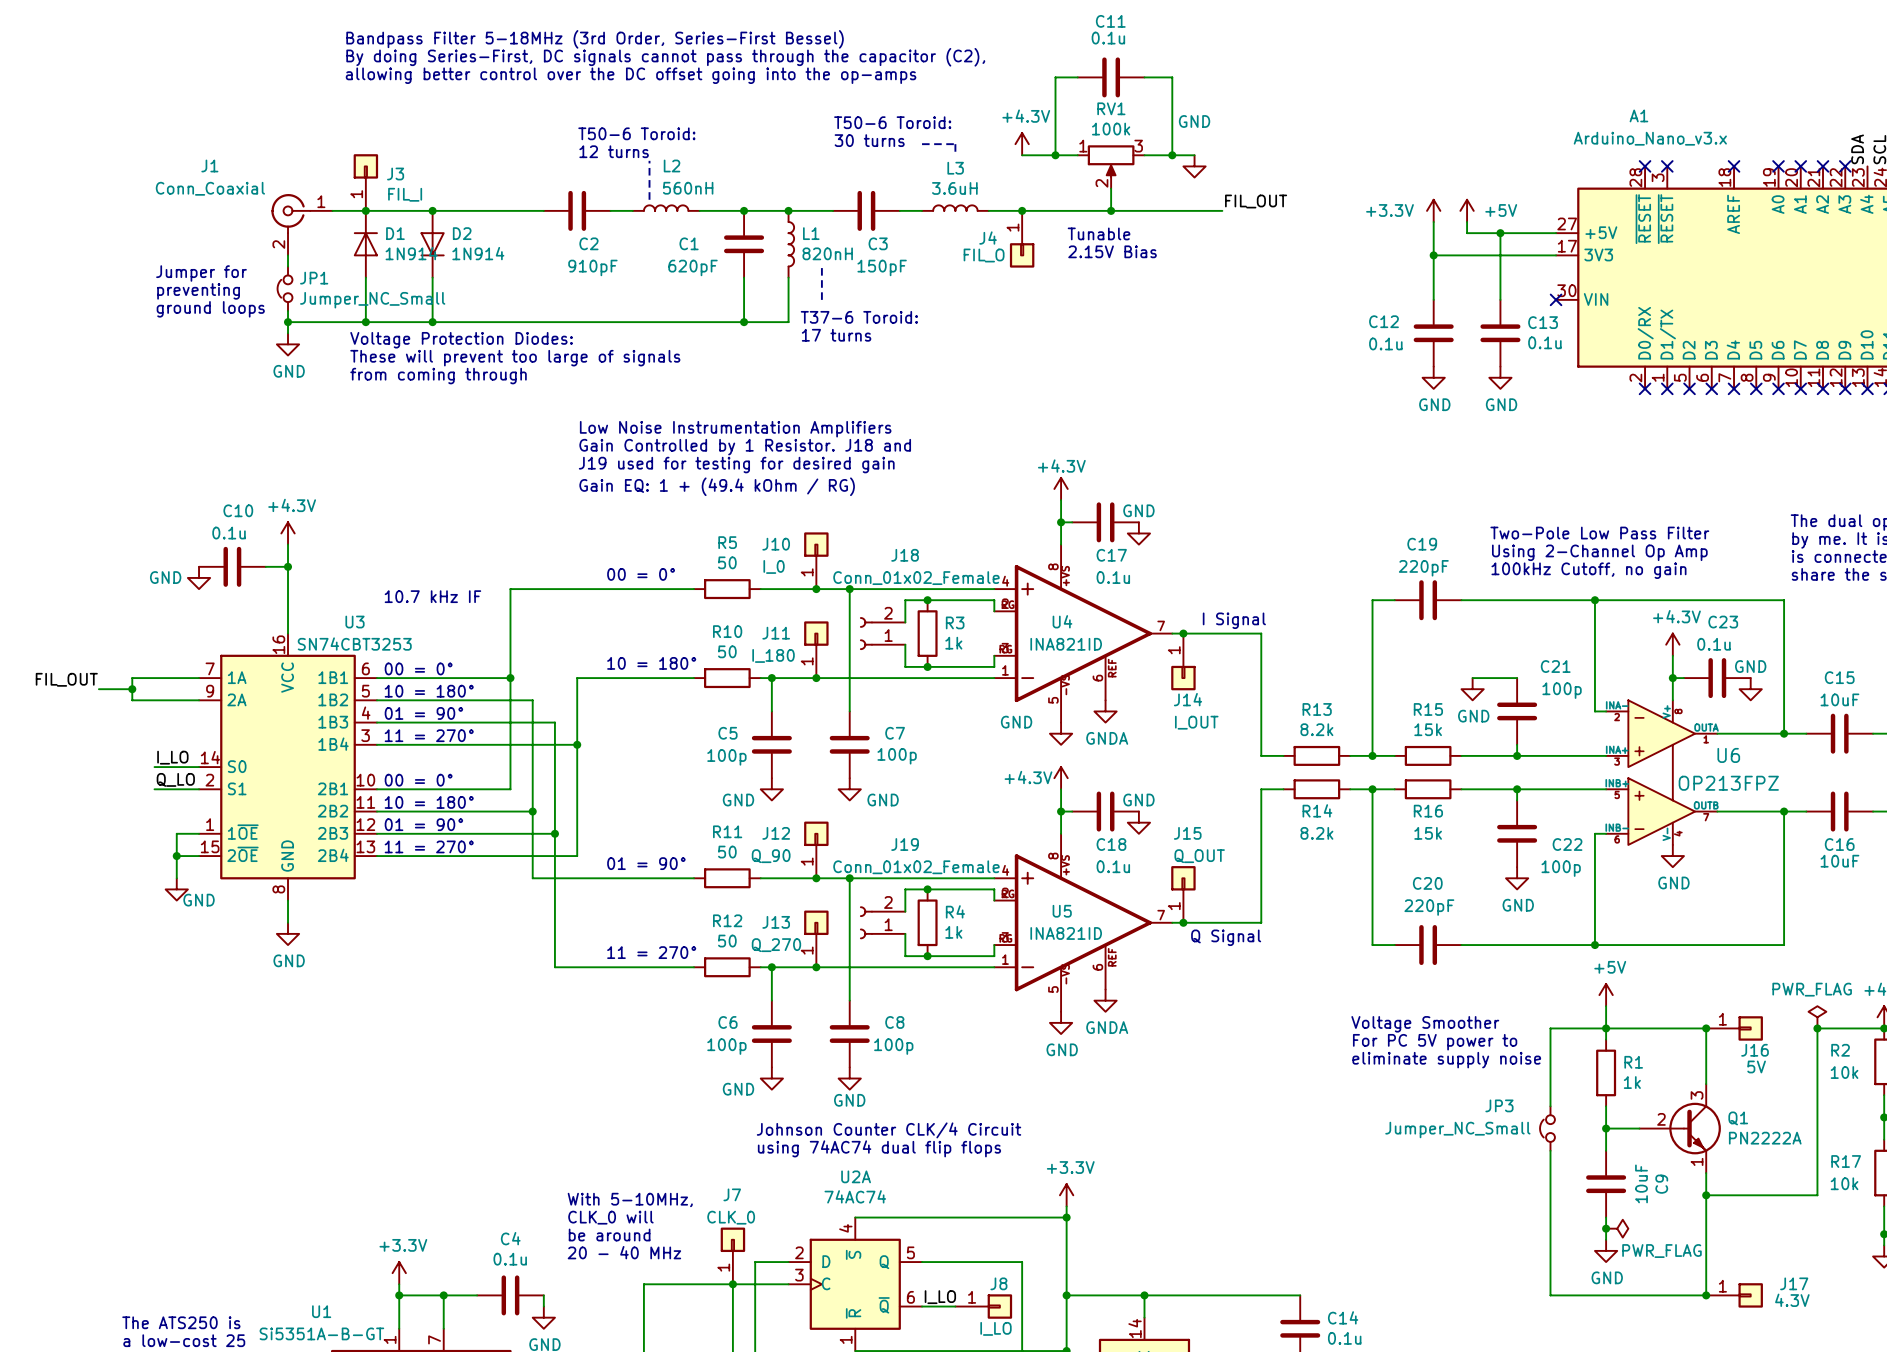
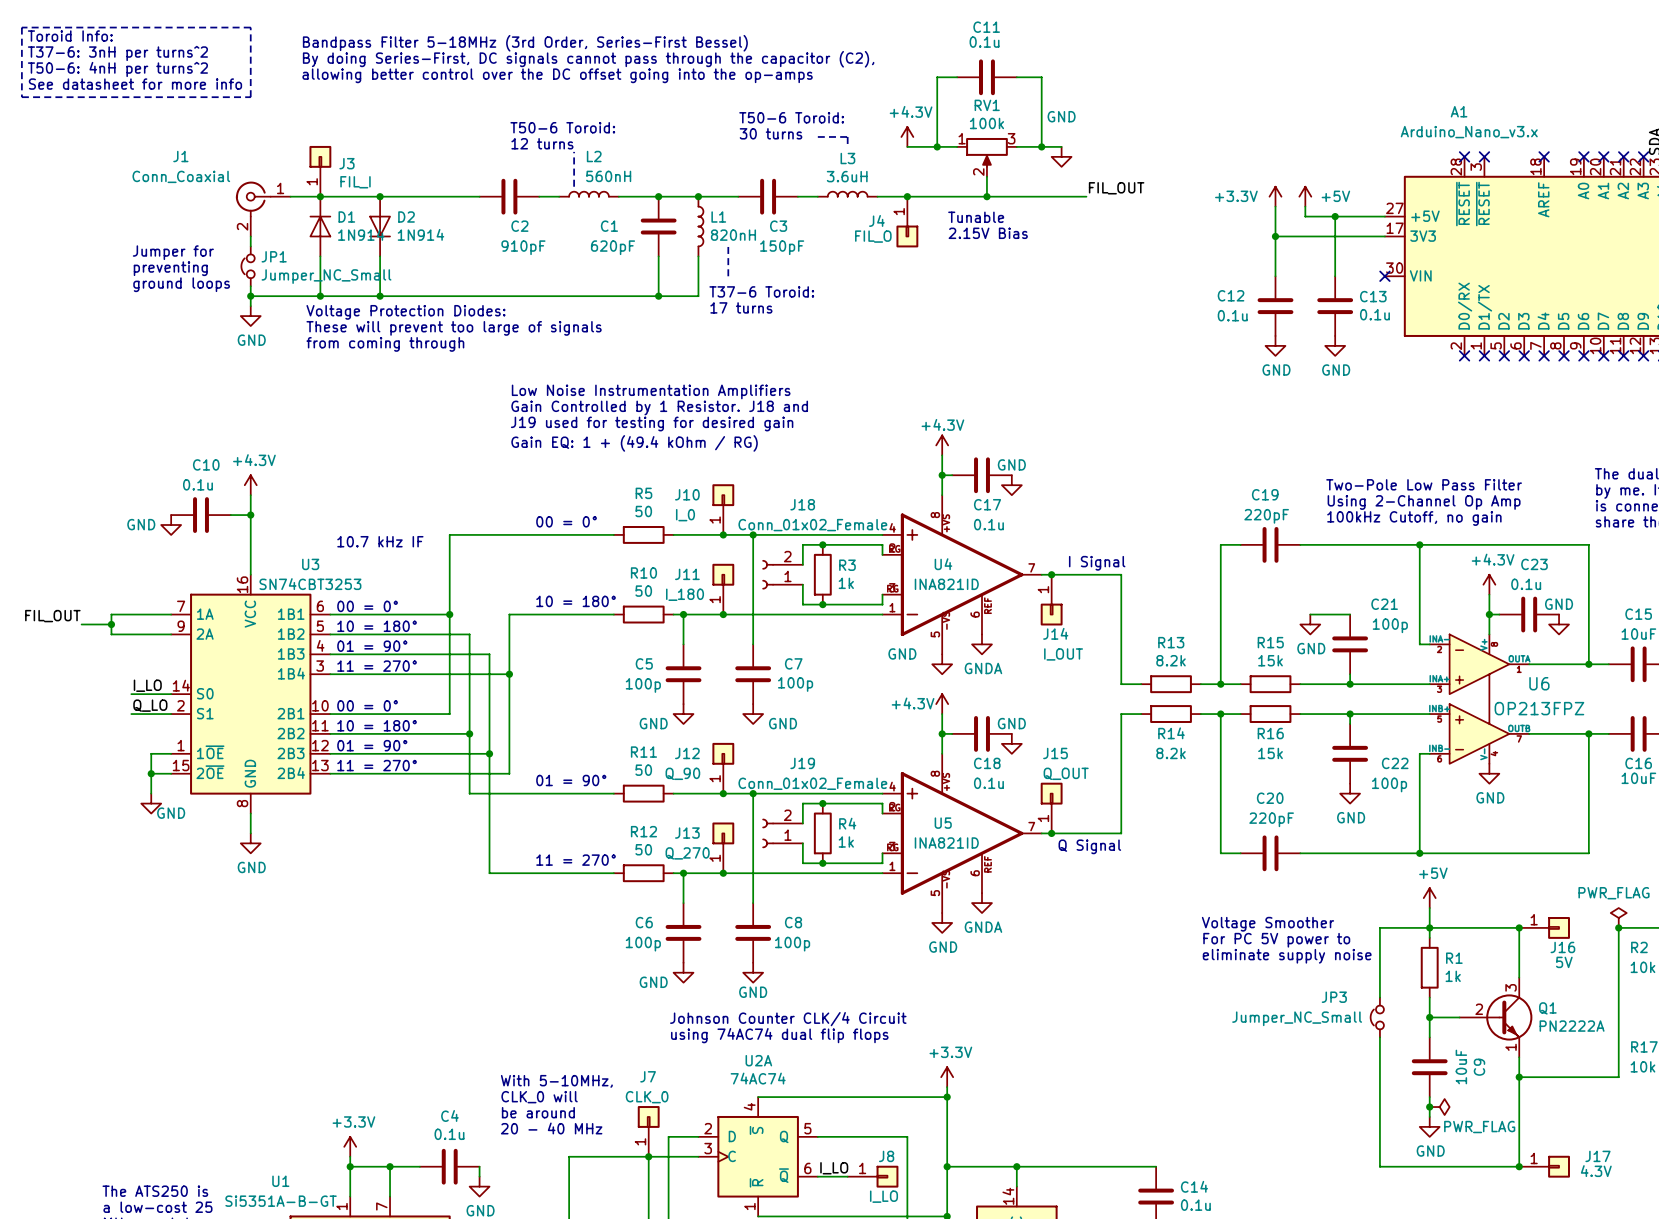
line: none -> (21, 27) (21, 97) (250, 97) (250, 27) (21, 27)
text: none -> Toroid Info: (70, 36)
text: none -> T37-6: 3nH per turns^2 (117, 53)
text: none -> T50-6: 4nH per turns^2 (117, 69)
text: none -> See datasheet for more info (135, 84)

